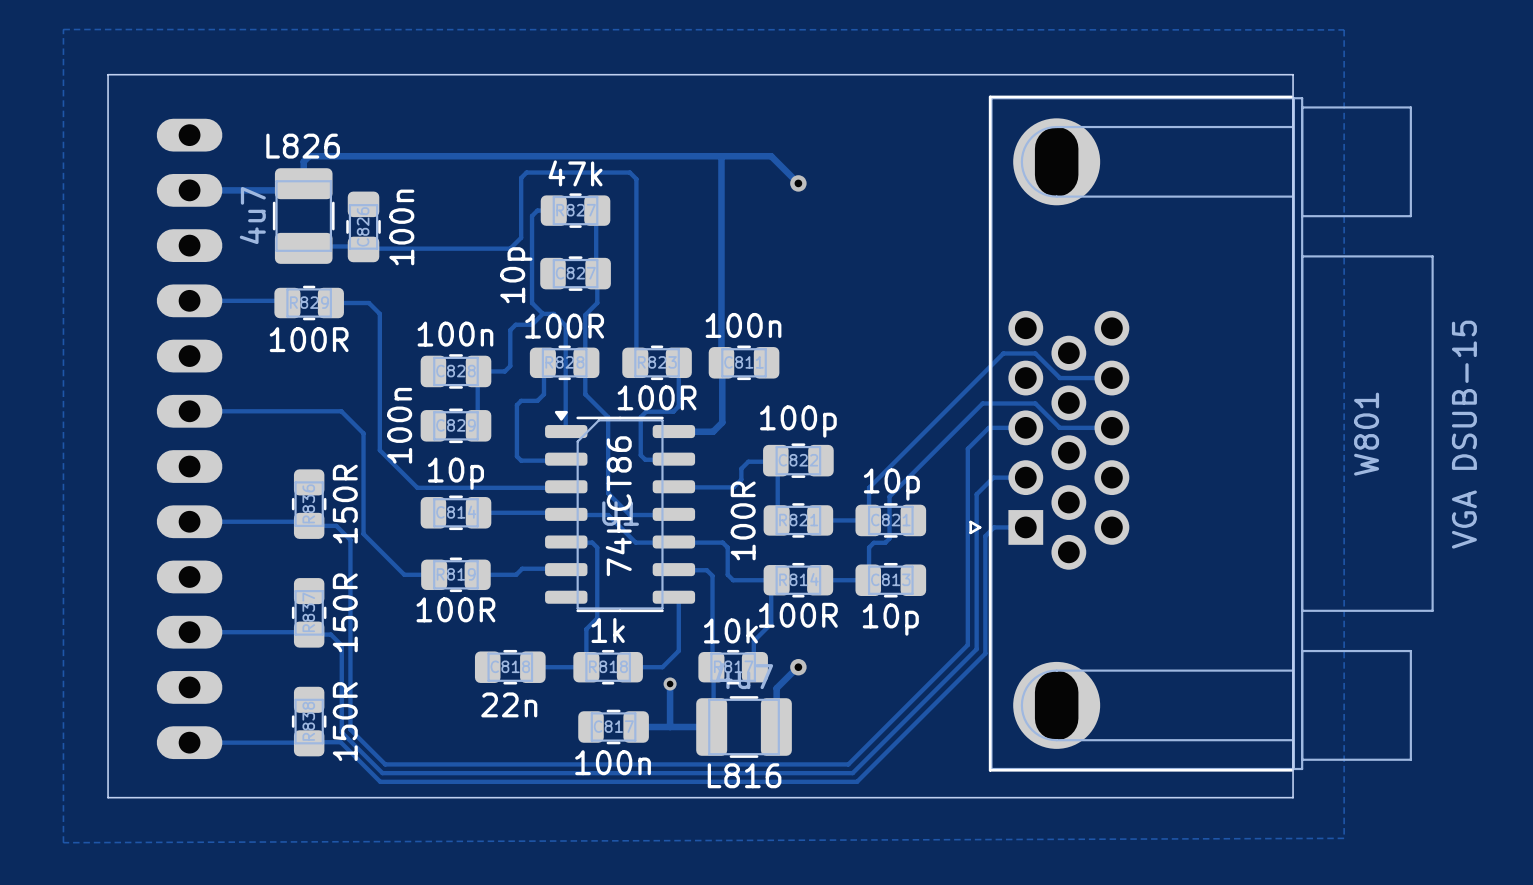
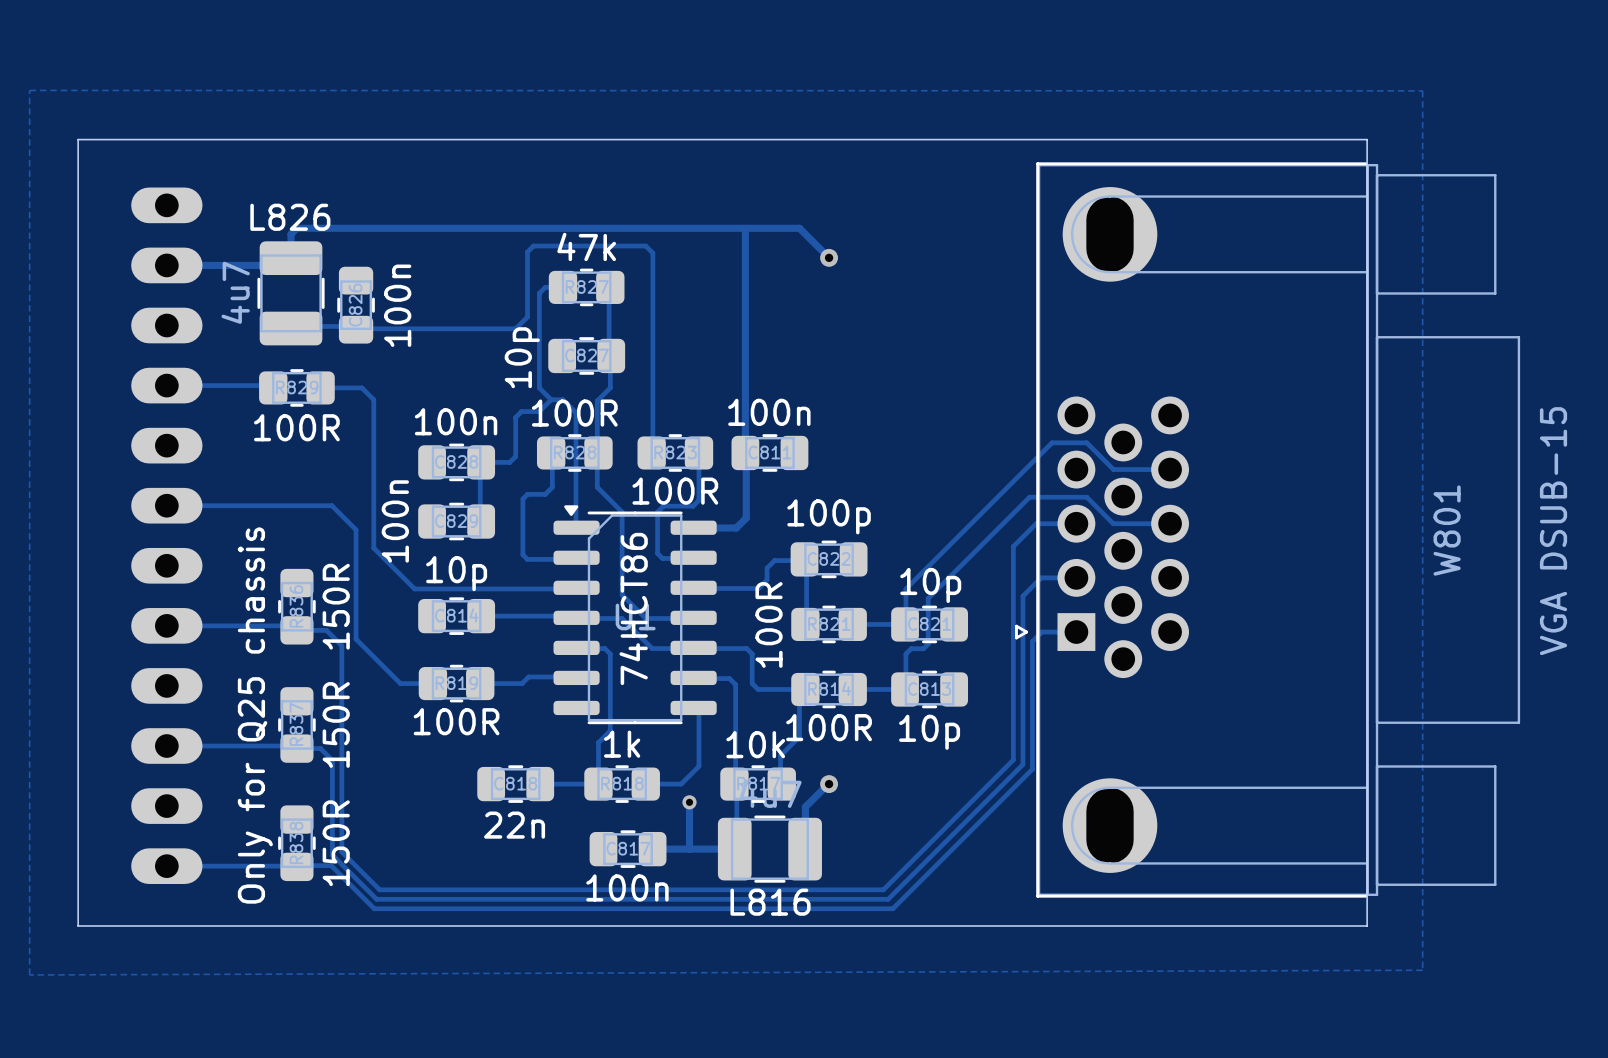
text: none -> Only for Q25 chassis (255, 715)

